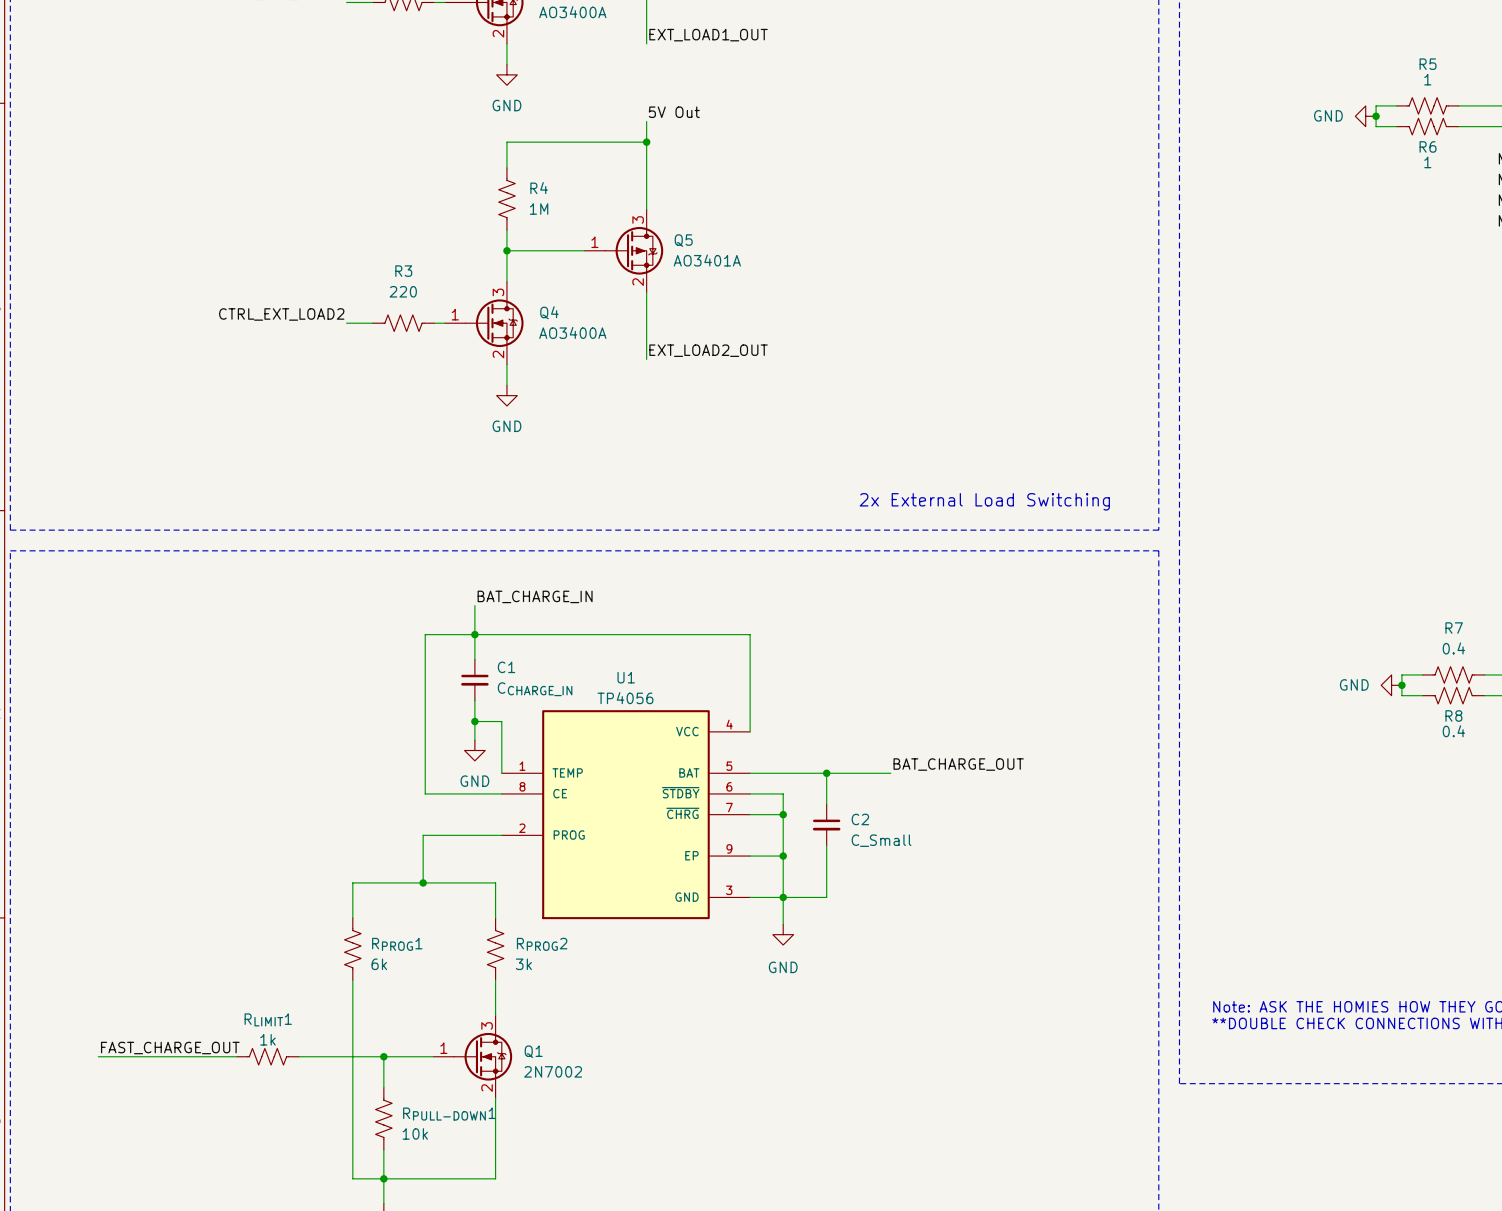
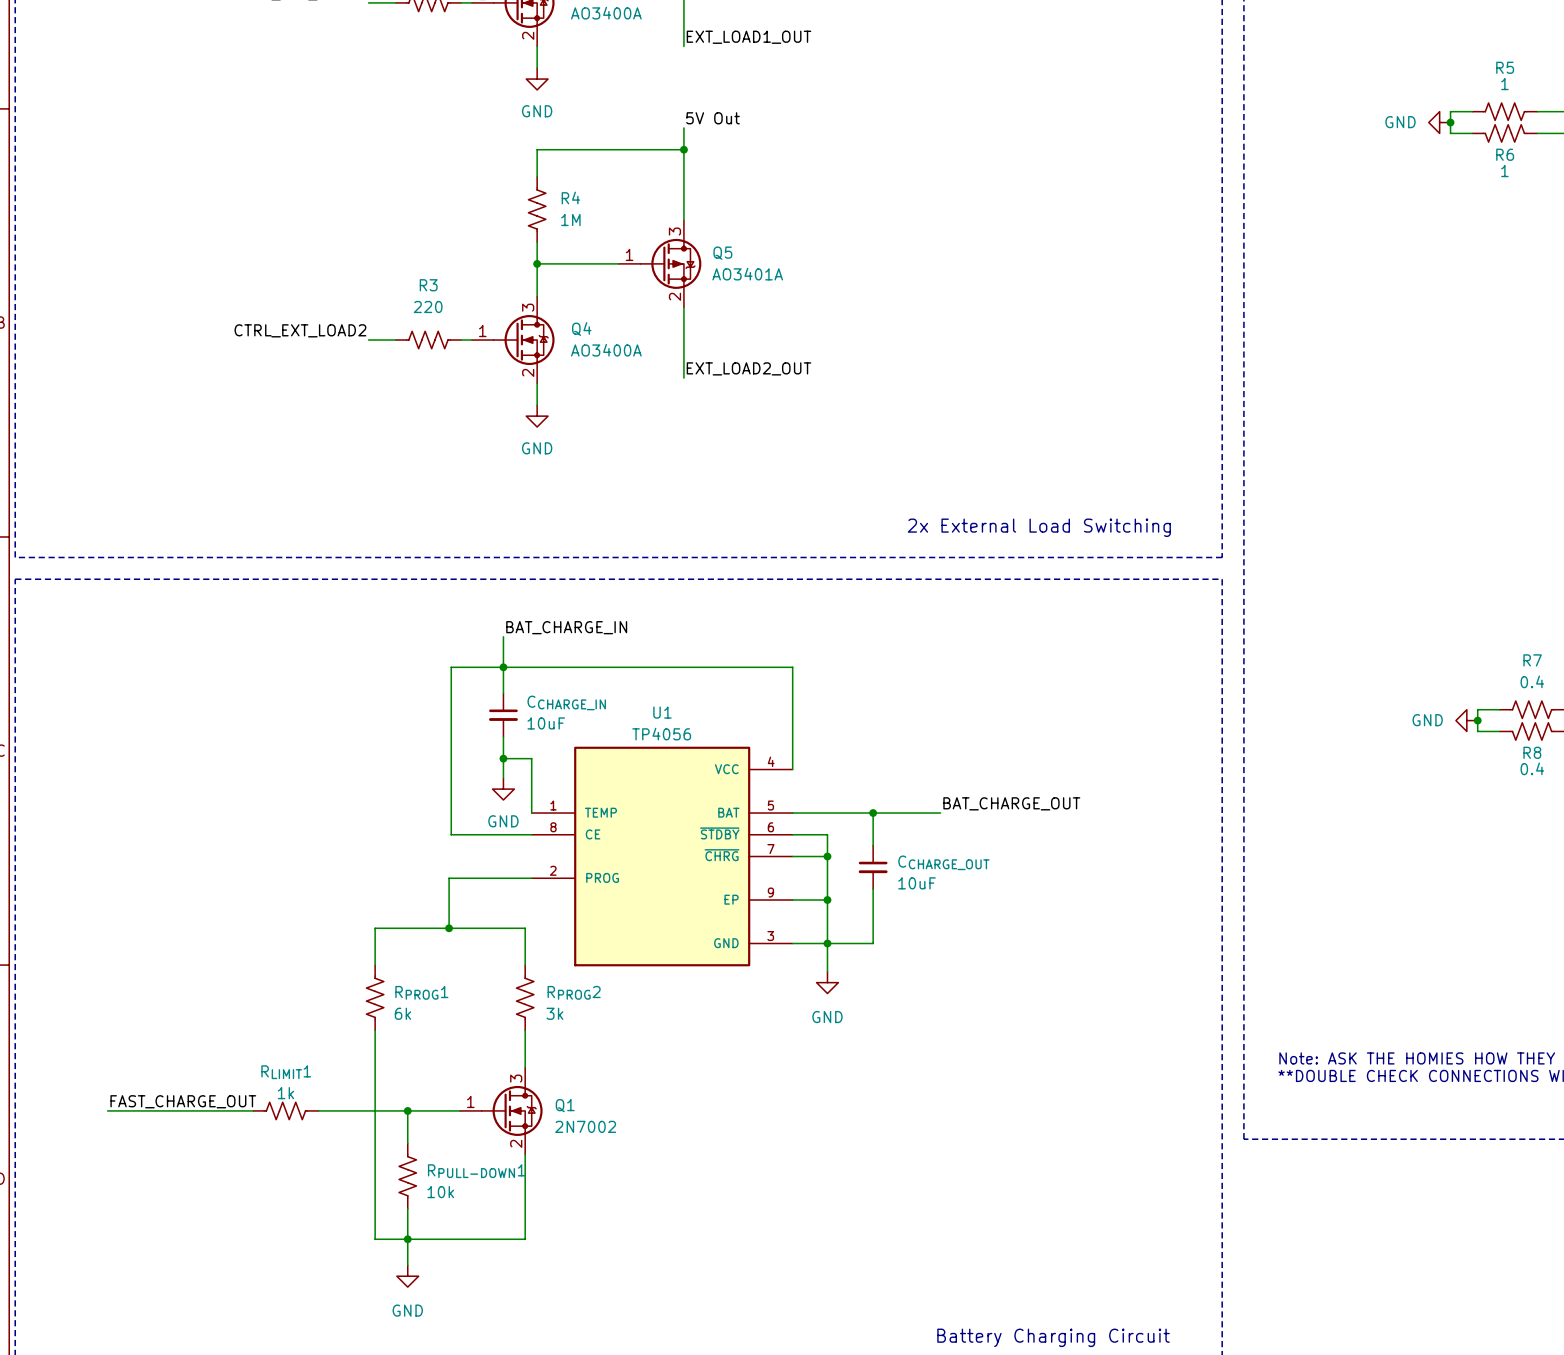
C1 name: C1 (506, 667) -> CCHARGE_IN (566, 702)
C1 value: CCHARGE_IN (535, 689) -> 10uF (546, 723)
C2 name: C2 (860, 819) -> CCHARGE_OUT (943, 862)
C2 value: C_Small (881, 840) -> 10uF (917, 883)

